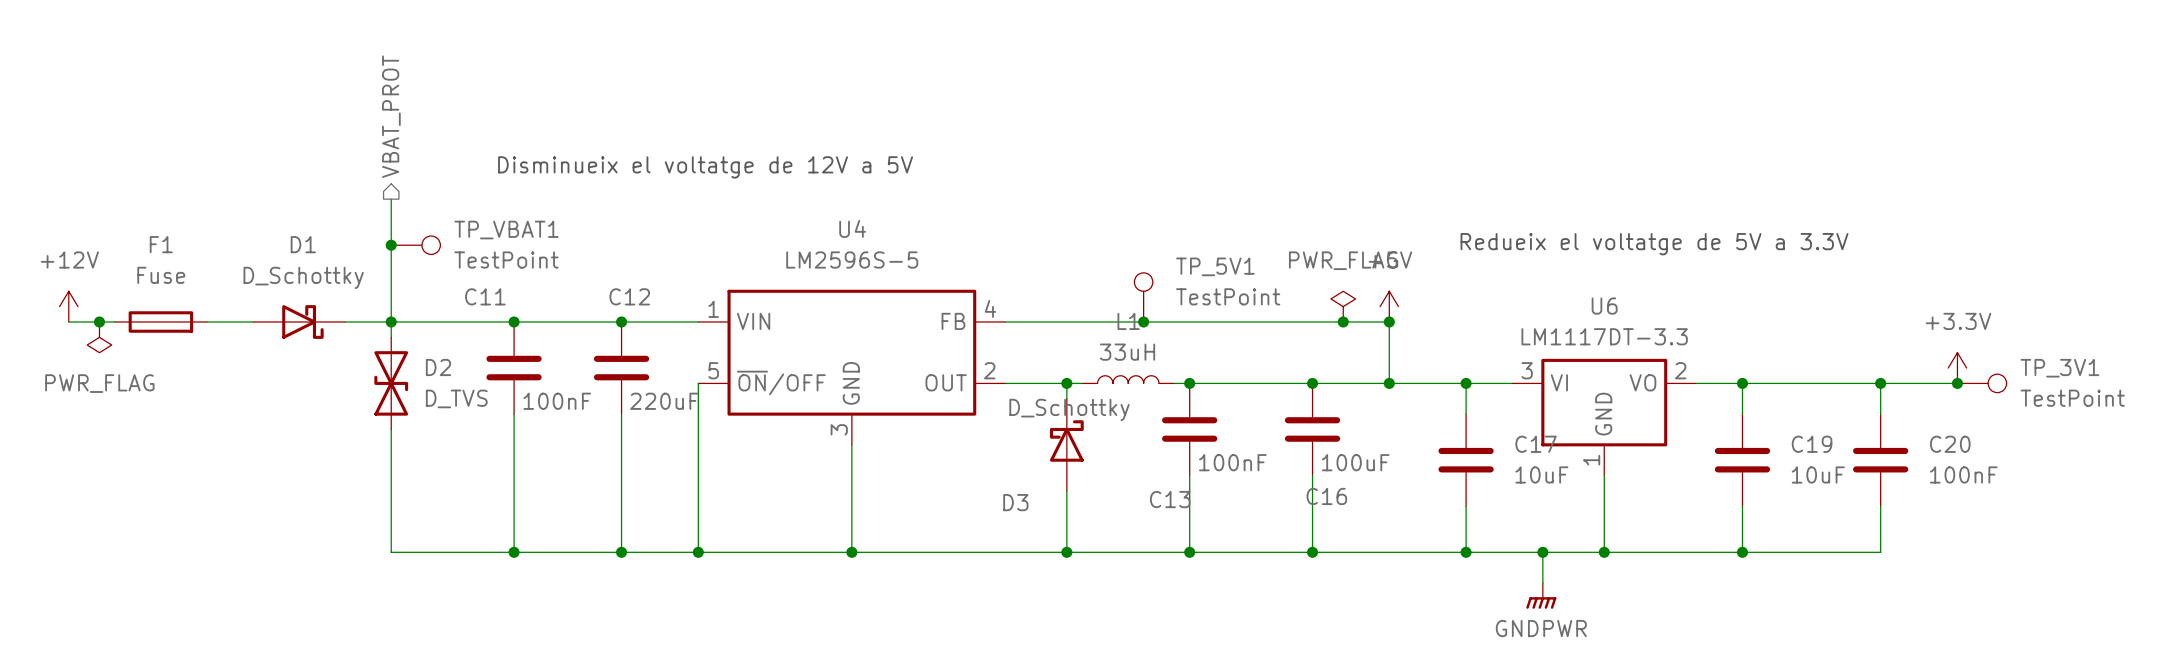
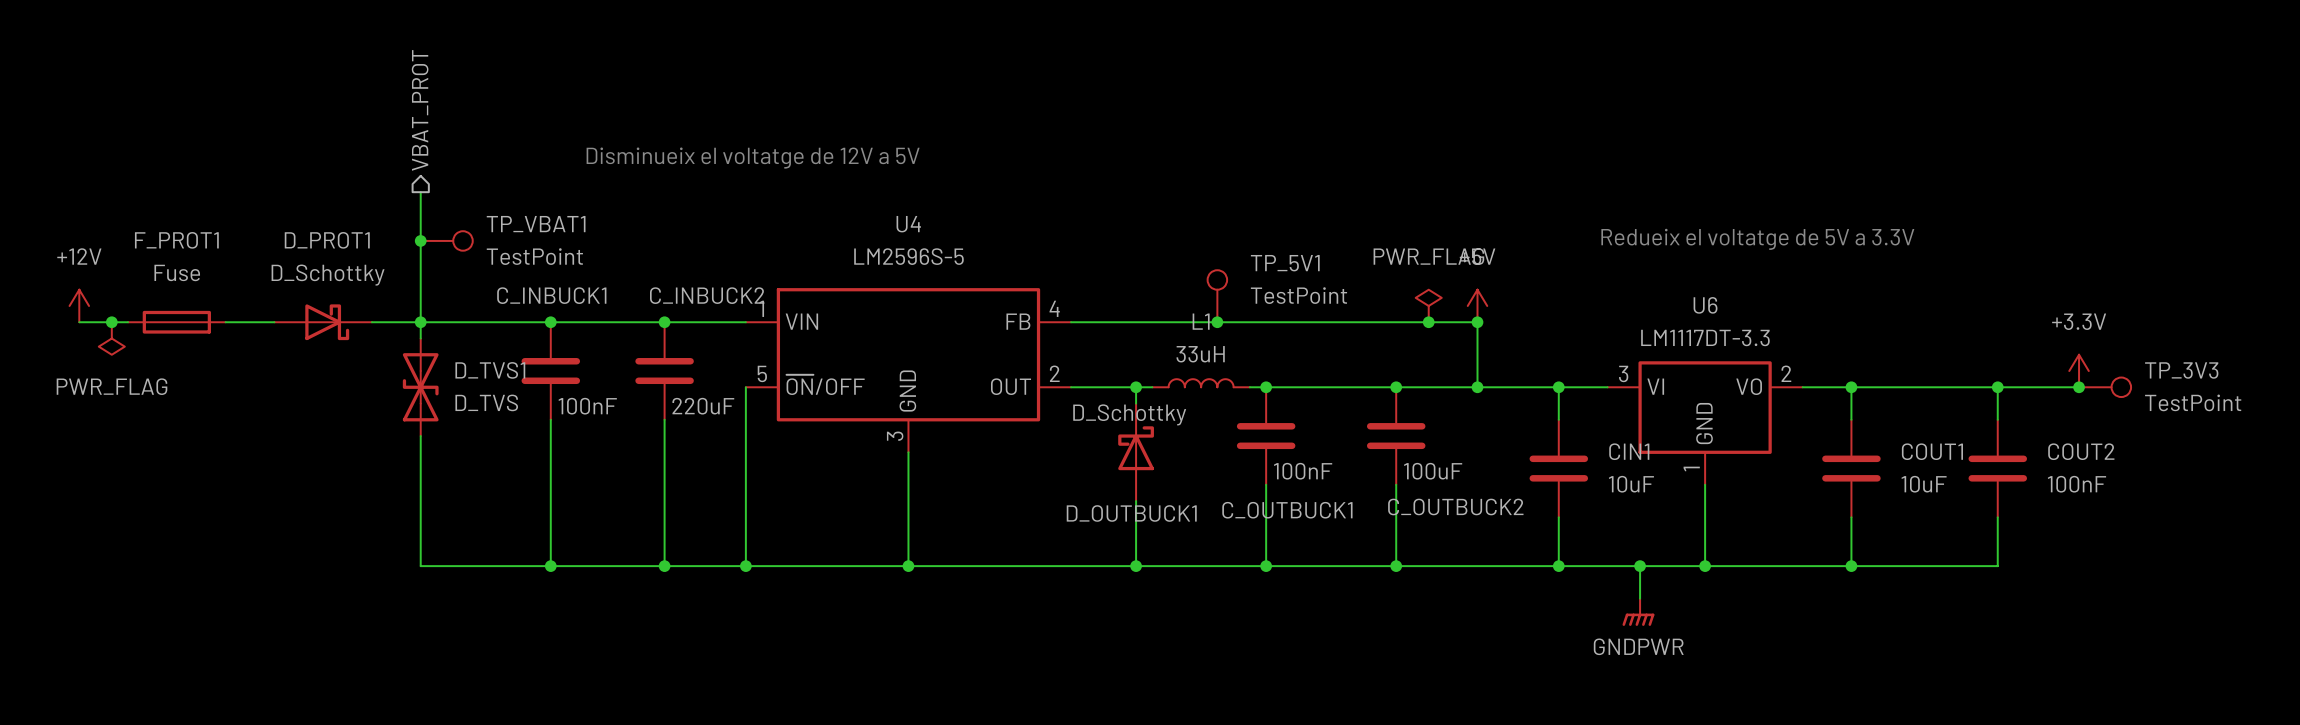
F1 name: F1 (161, 244) -> F_PROT1 (176, 240)
D1 name: D1 (303, 244) -> D_PROT1 (327, 240)
C11 name: C11 (485, 296) -> C_INBUCK1 (551, 295)
C12 name: C12 (629, 296) -> C_INBUCK2 (707, 295)
D2 name: D2 (438, 367) -> D_TVS1 (490, 370)
TP_3V1 name: TP_3V1 (2059, 368) -> TP_3V3 (2181, 370)
C17 name: C17 (1536, 444) -> CIN1 (1629, 451)
C19 name: C19 (1812, 444) -> COUT1 (1932, 451)
C20 name: C20 (1950, 444) -> COUT2 (2081, 451)
C16 name: C16 (1326, 496) -> C_OUTBUCK2 (1455, 506)
C13 name: C13 (1170, 499) -> C_OUTBUCK1 (1287, 510)
D3 name: D3 (1015, 502) -> D_OUTBUCK1 (1131, 513)

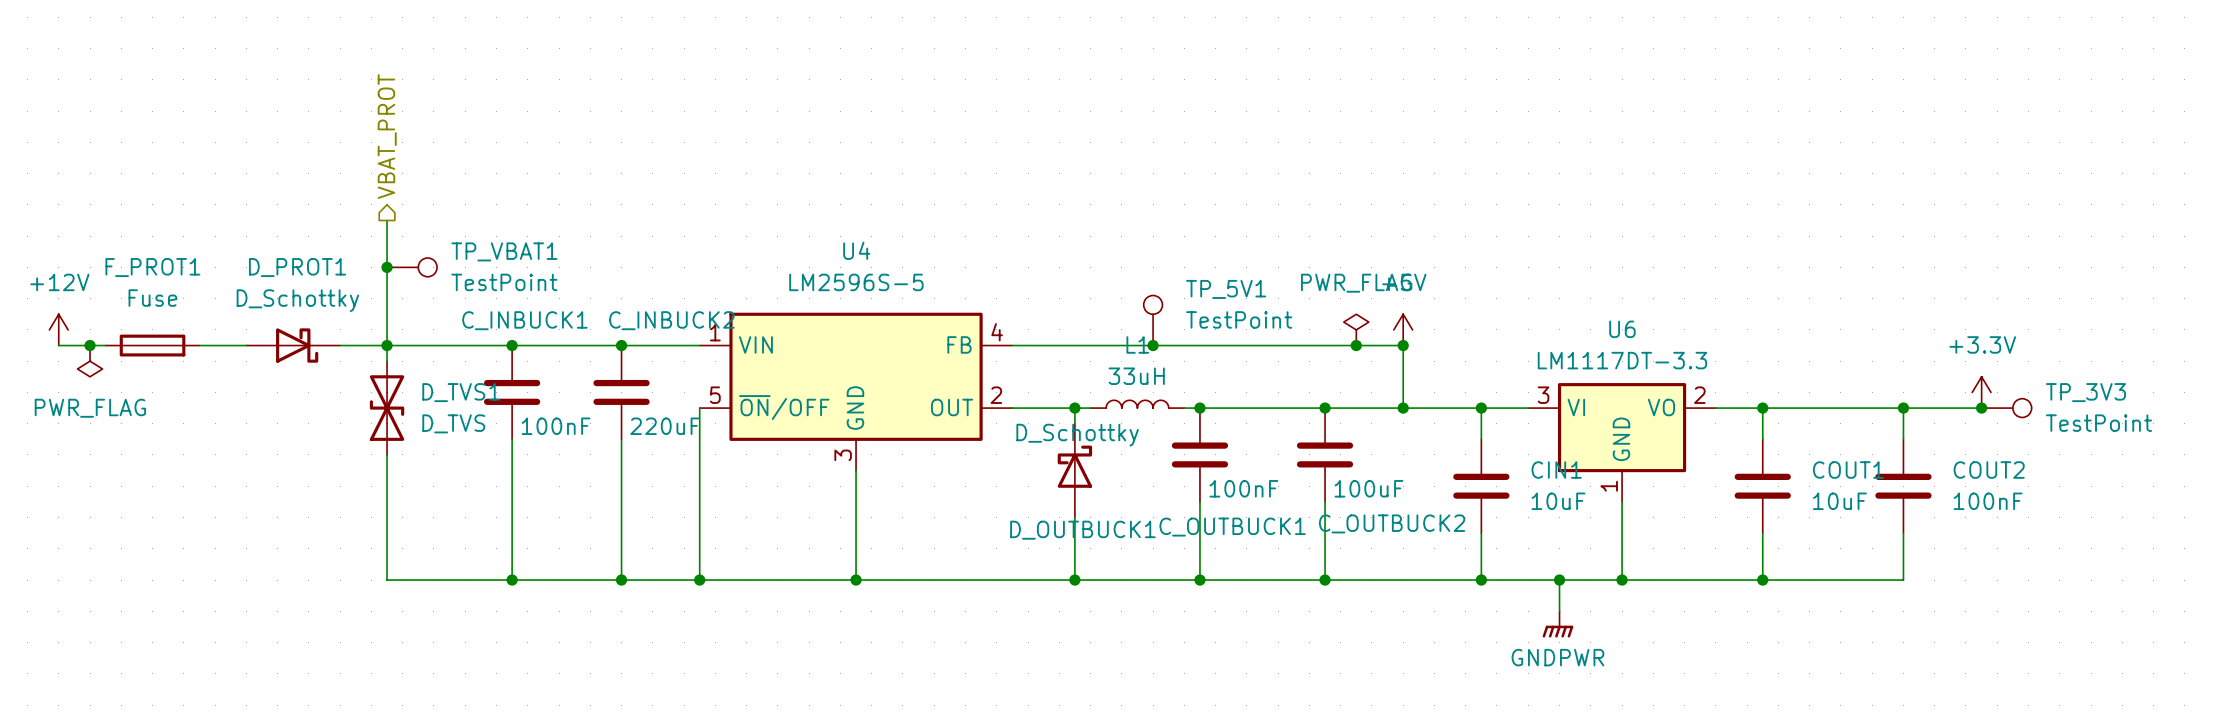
text: Disminueix el voltatge de 12V a 5V (753, 158) -> none
text: Redueix el voltatge de 5V a 3.3V (1757, 239) -> none

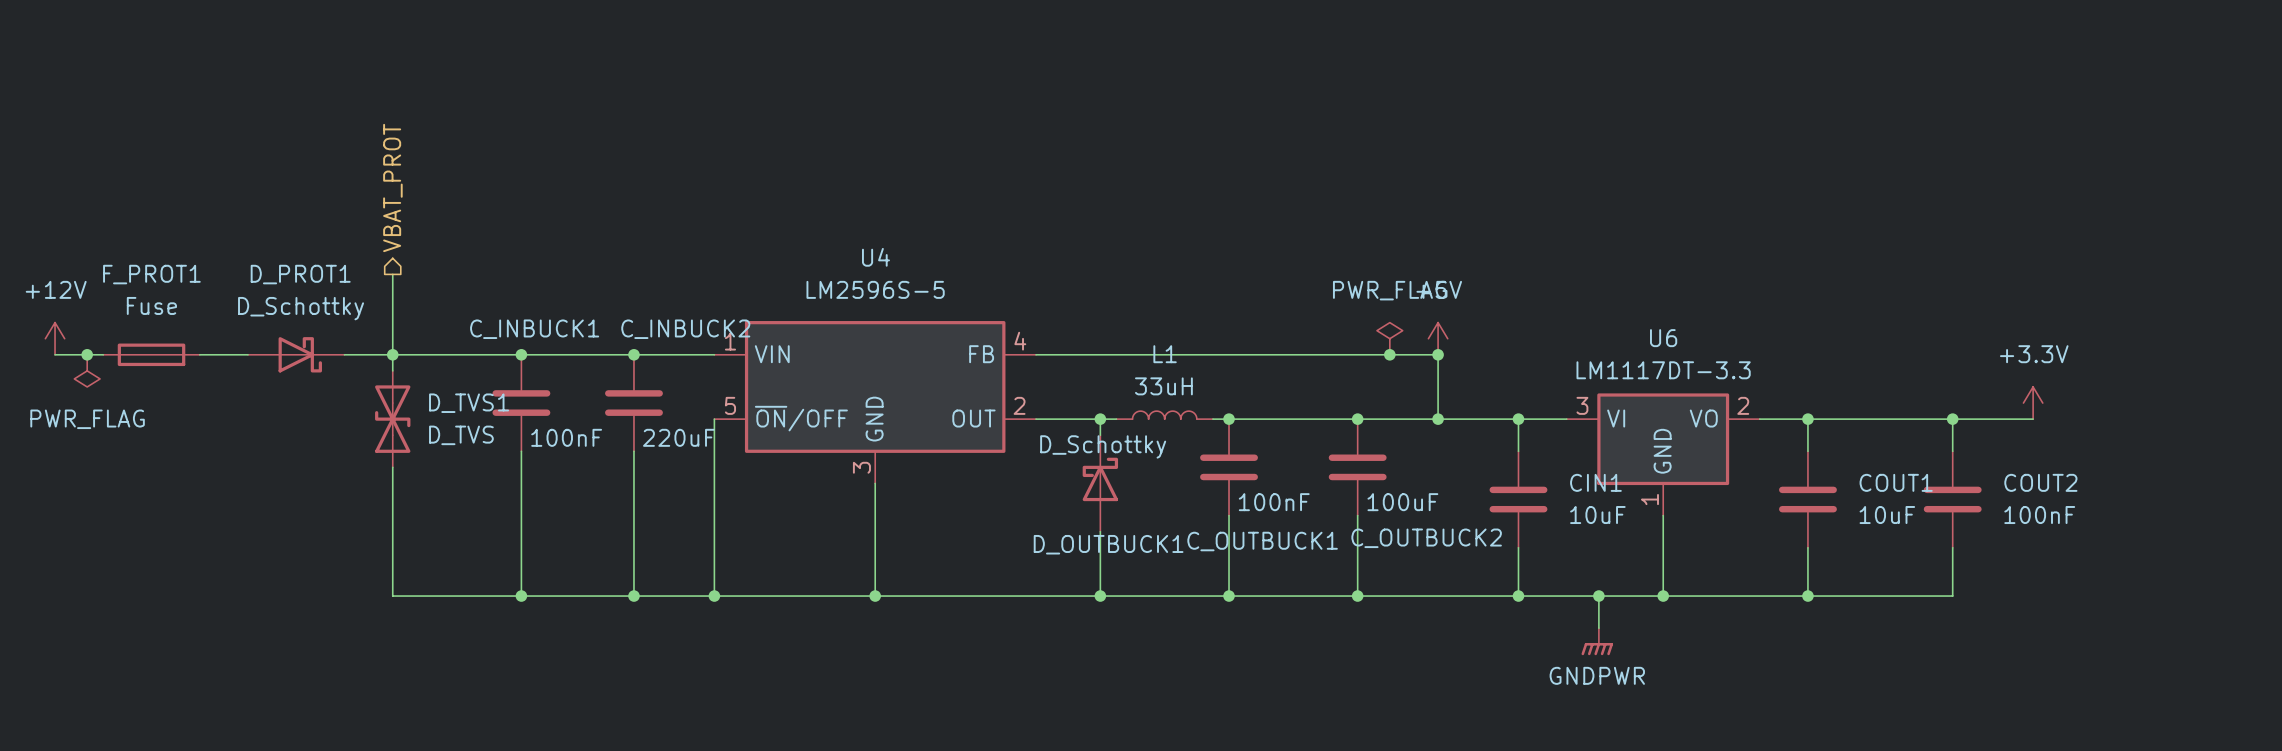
hierarchical label position: VBAT_PROT (387, 136) -> VBAT_PROT (392, 187)
wire: (387, 220) (387, 267) -> none
junction: (387, 267) -> none
TP_VBAT1: TestPoint (412, 267) -> none
TP_5V1: TestPoint (1153, 320) -> none
junction: (1153, 345) -> none
junction: (1981, 408) -> none
TP_3V3: TestPoint (2006, 408) -> none

